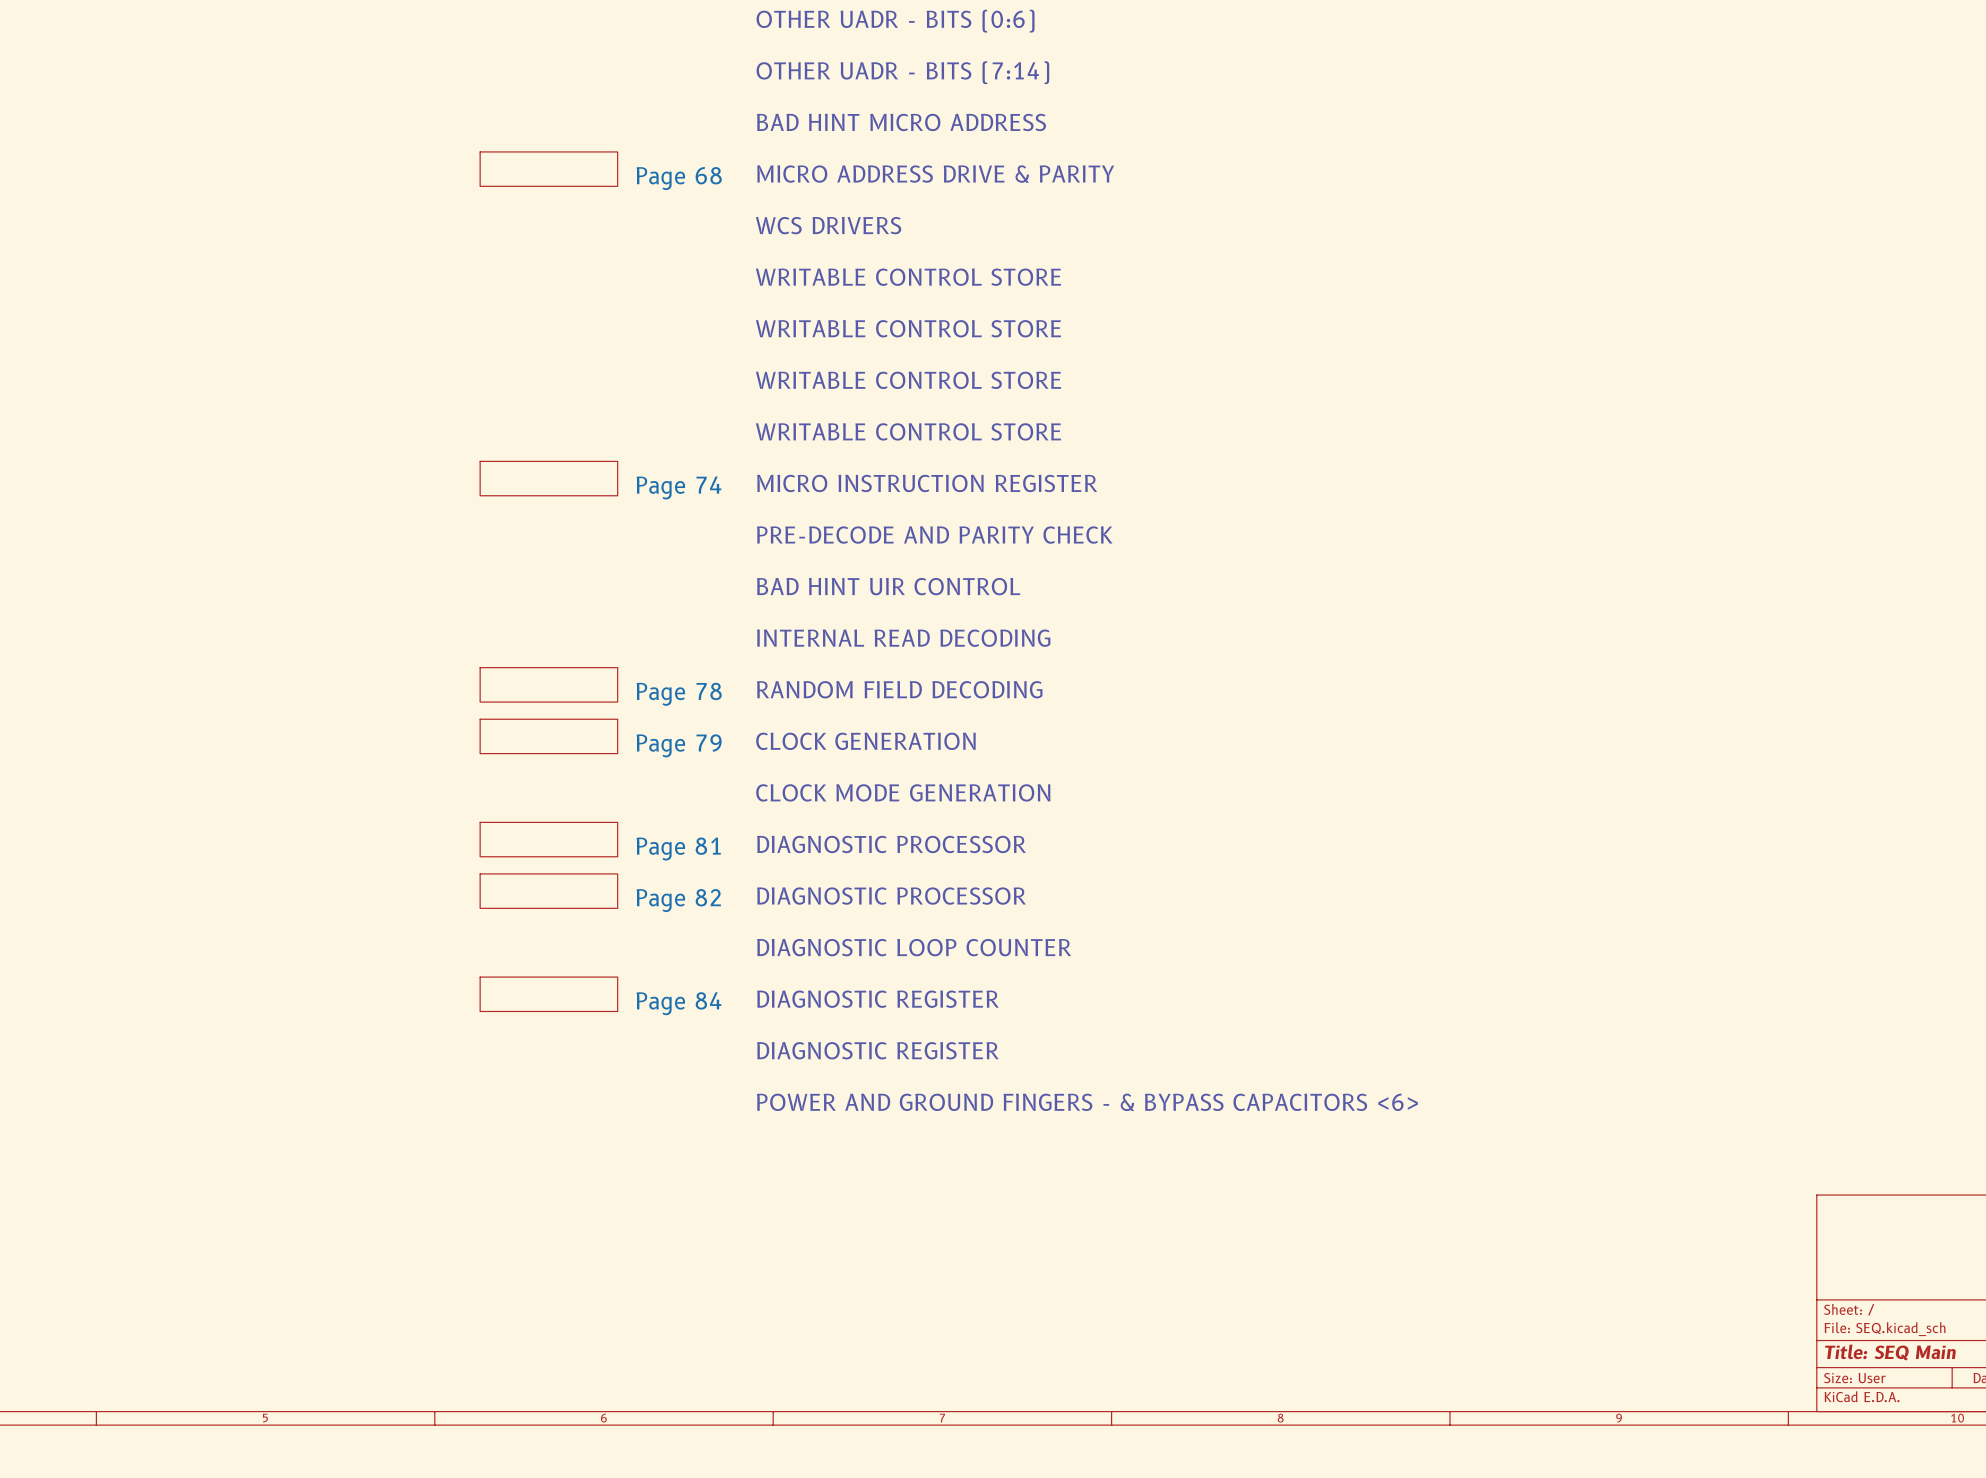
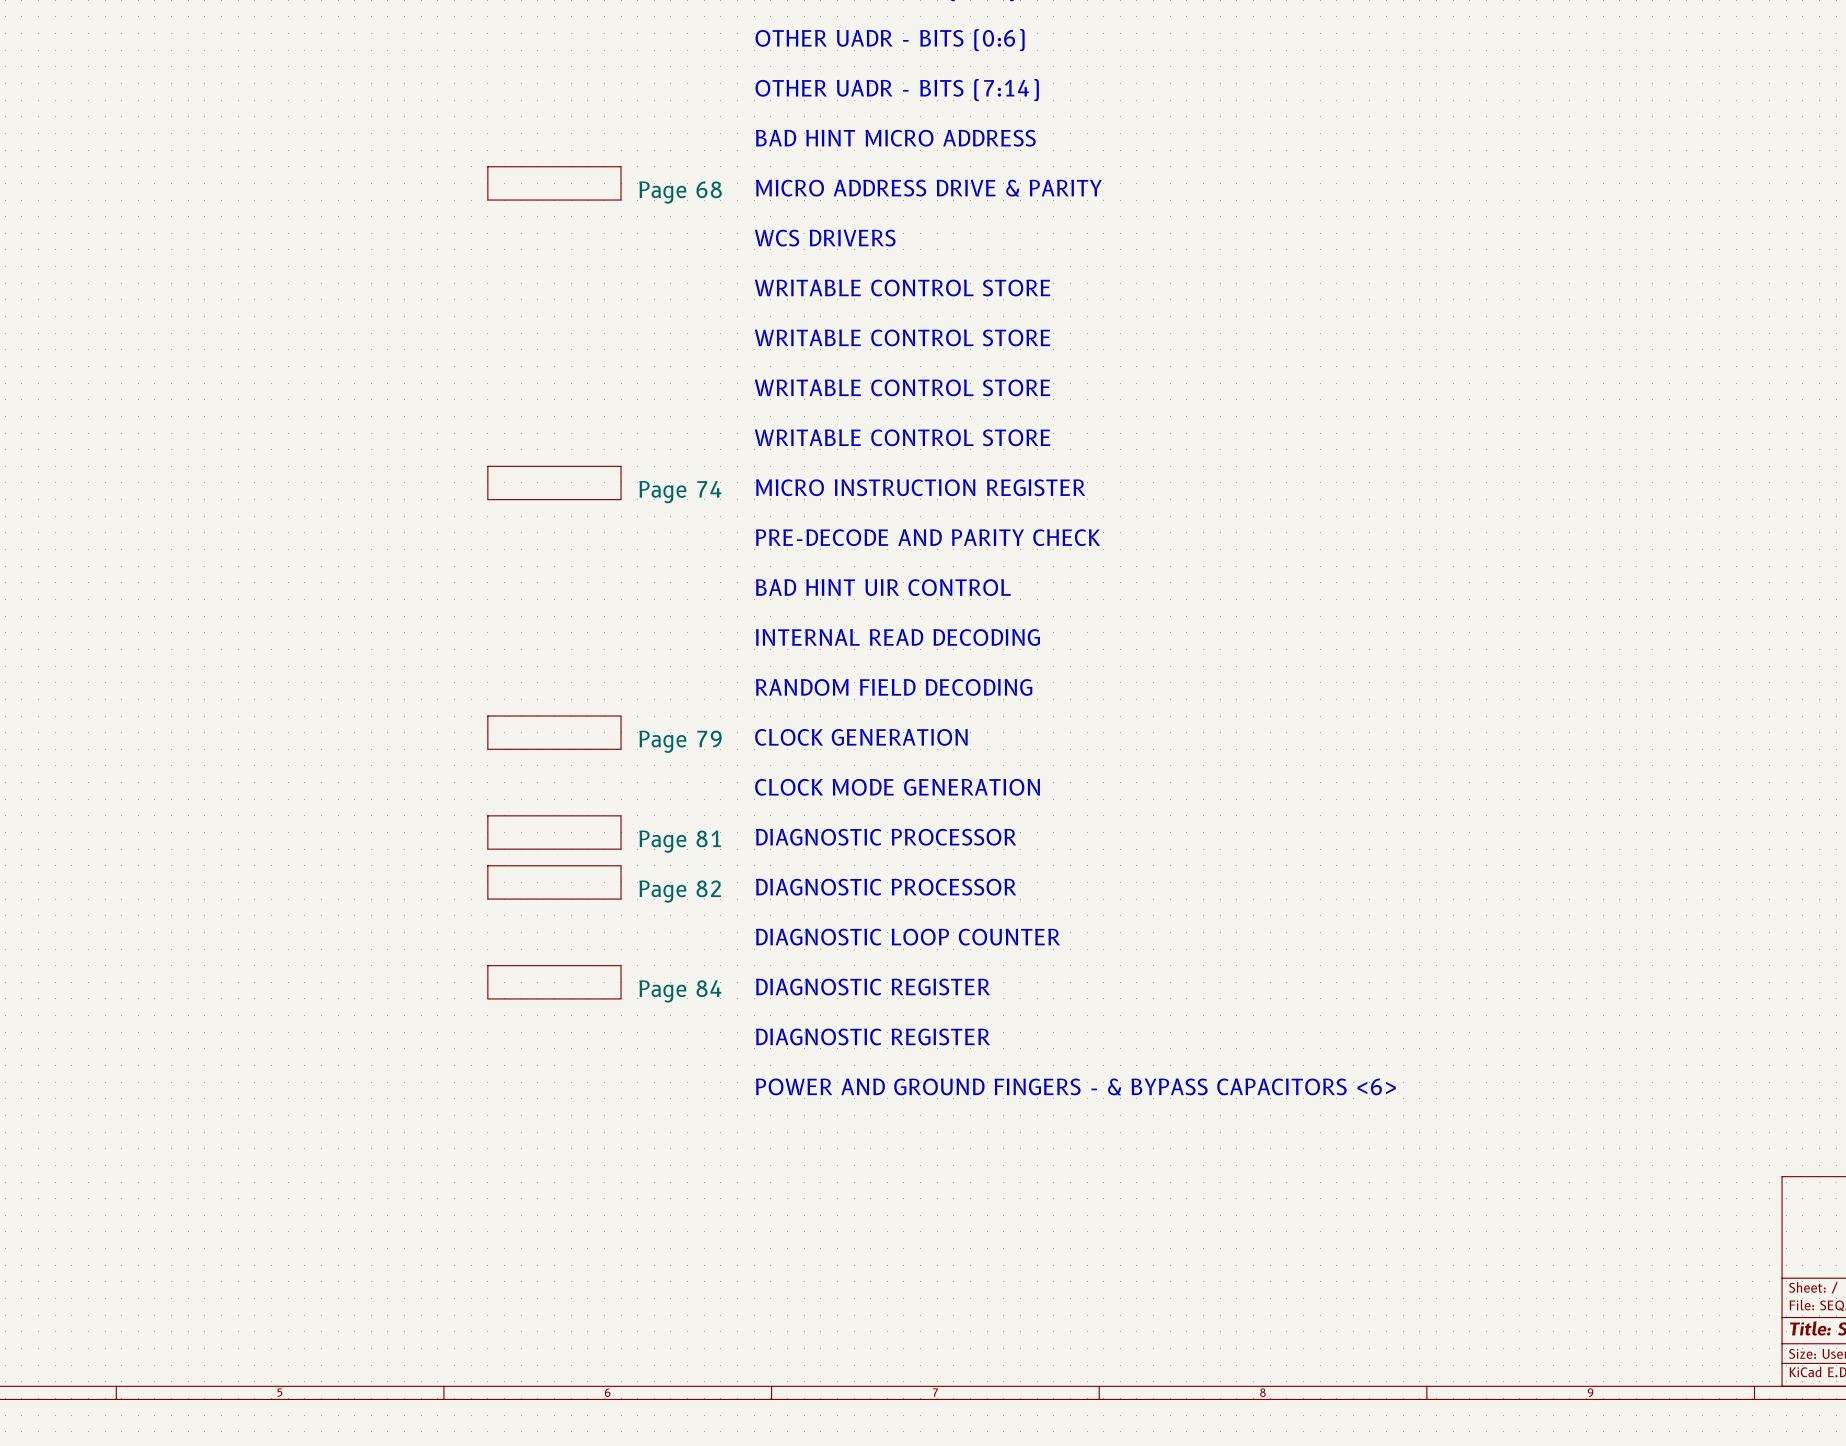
sheet Page 78: (548, 684) -> none

